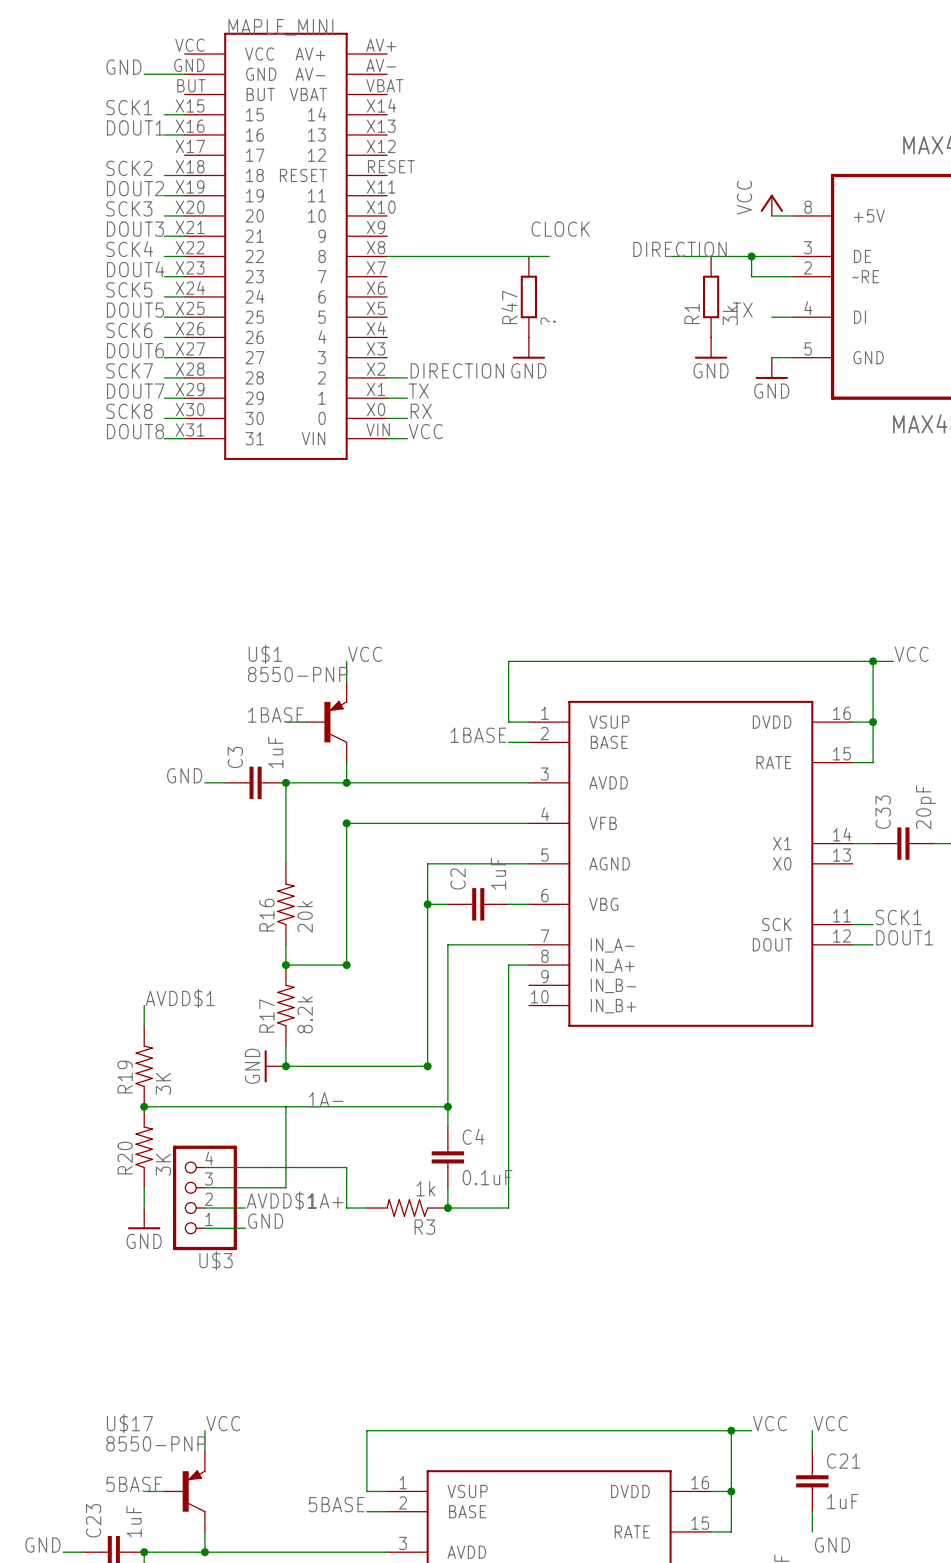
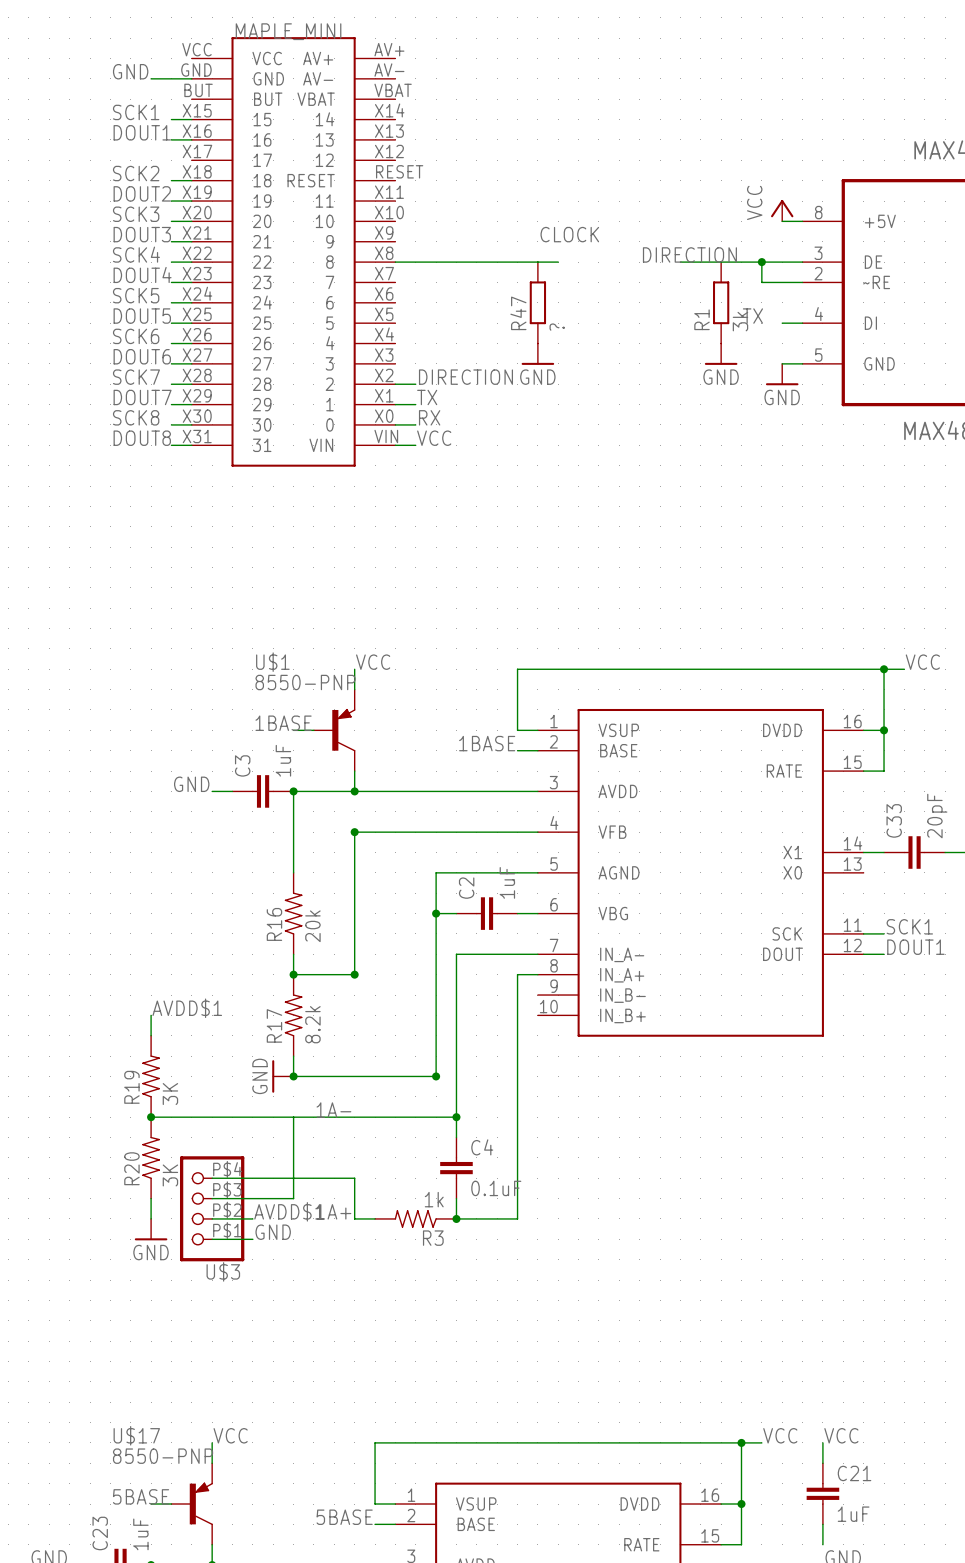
U$3 pin number: 4 (209, 1158) -> P$4 (227, 1169)
U$3 pin number: 3 (208, 1179) -> P$3 (227, 1189)
U$3 pin number: 2 (208, 1199) -> P$2 (227, 1210)
U$3 pin number: 1 (209, 1219) -> P$1 (227, 1230)

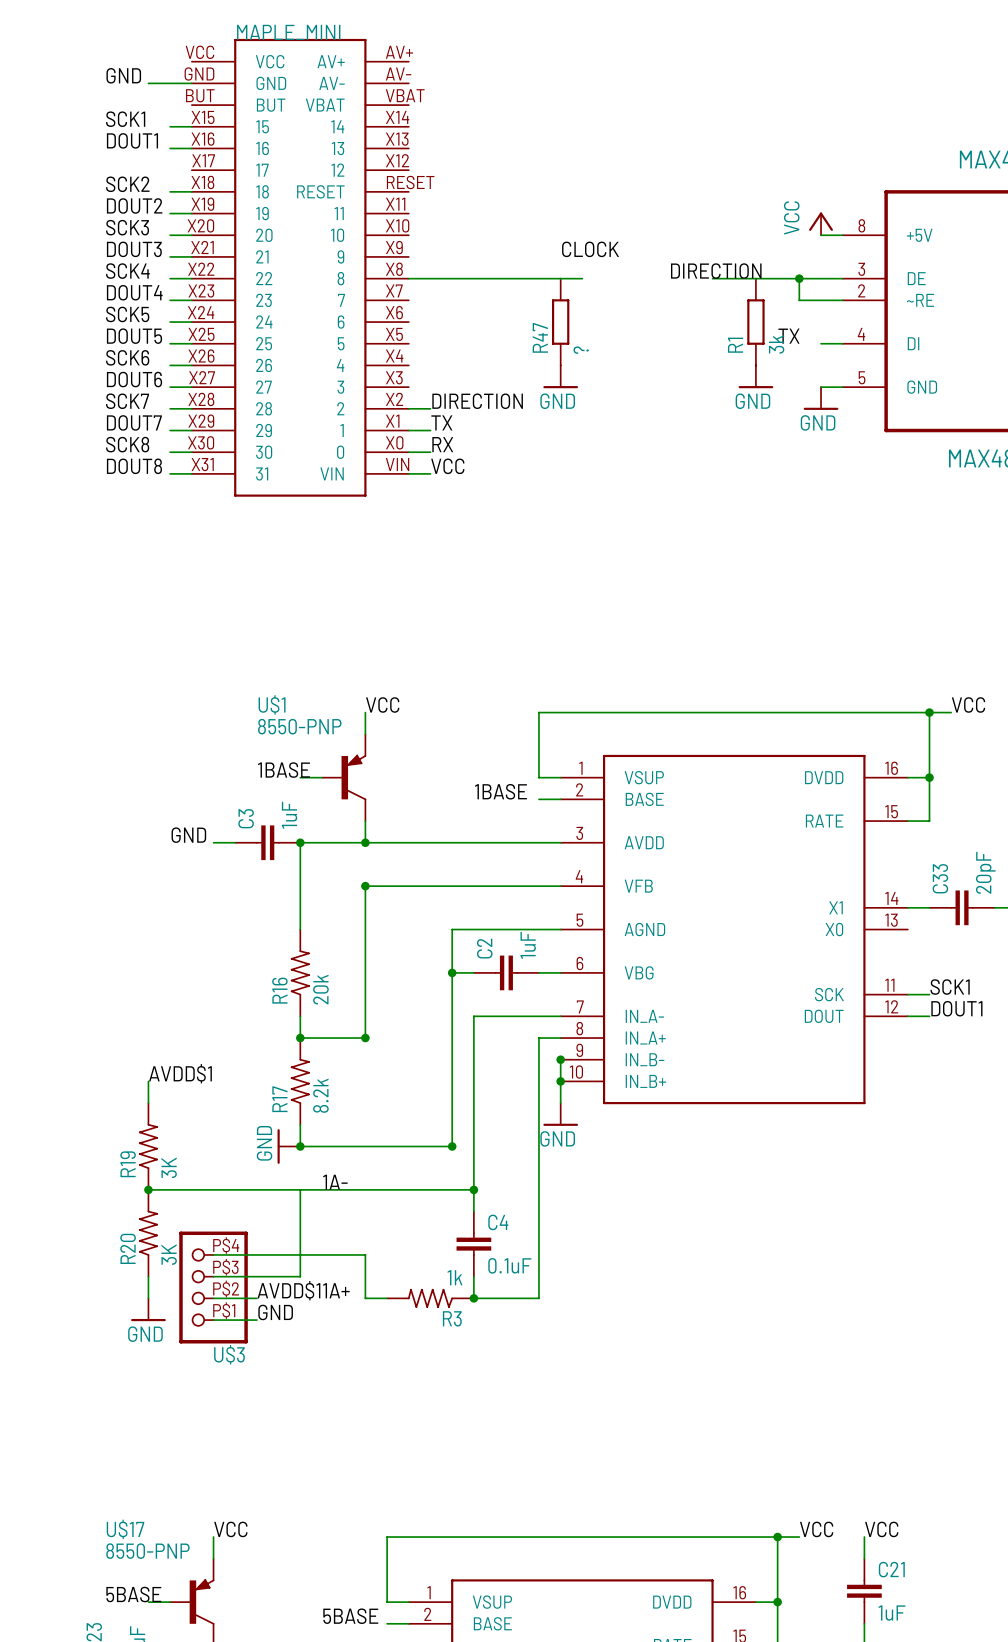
wire: none -> (560, 1059) (560, 1103)
junction: none -> (560, 1059)
junction: none -> (560, 1081)
power symbol: none -> GND (560, 1114)

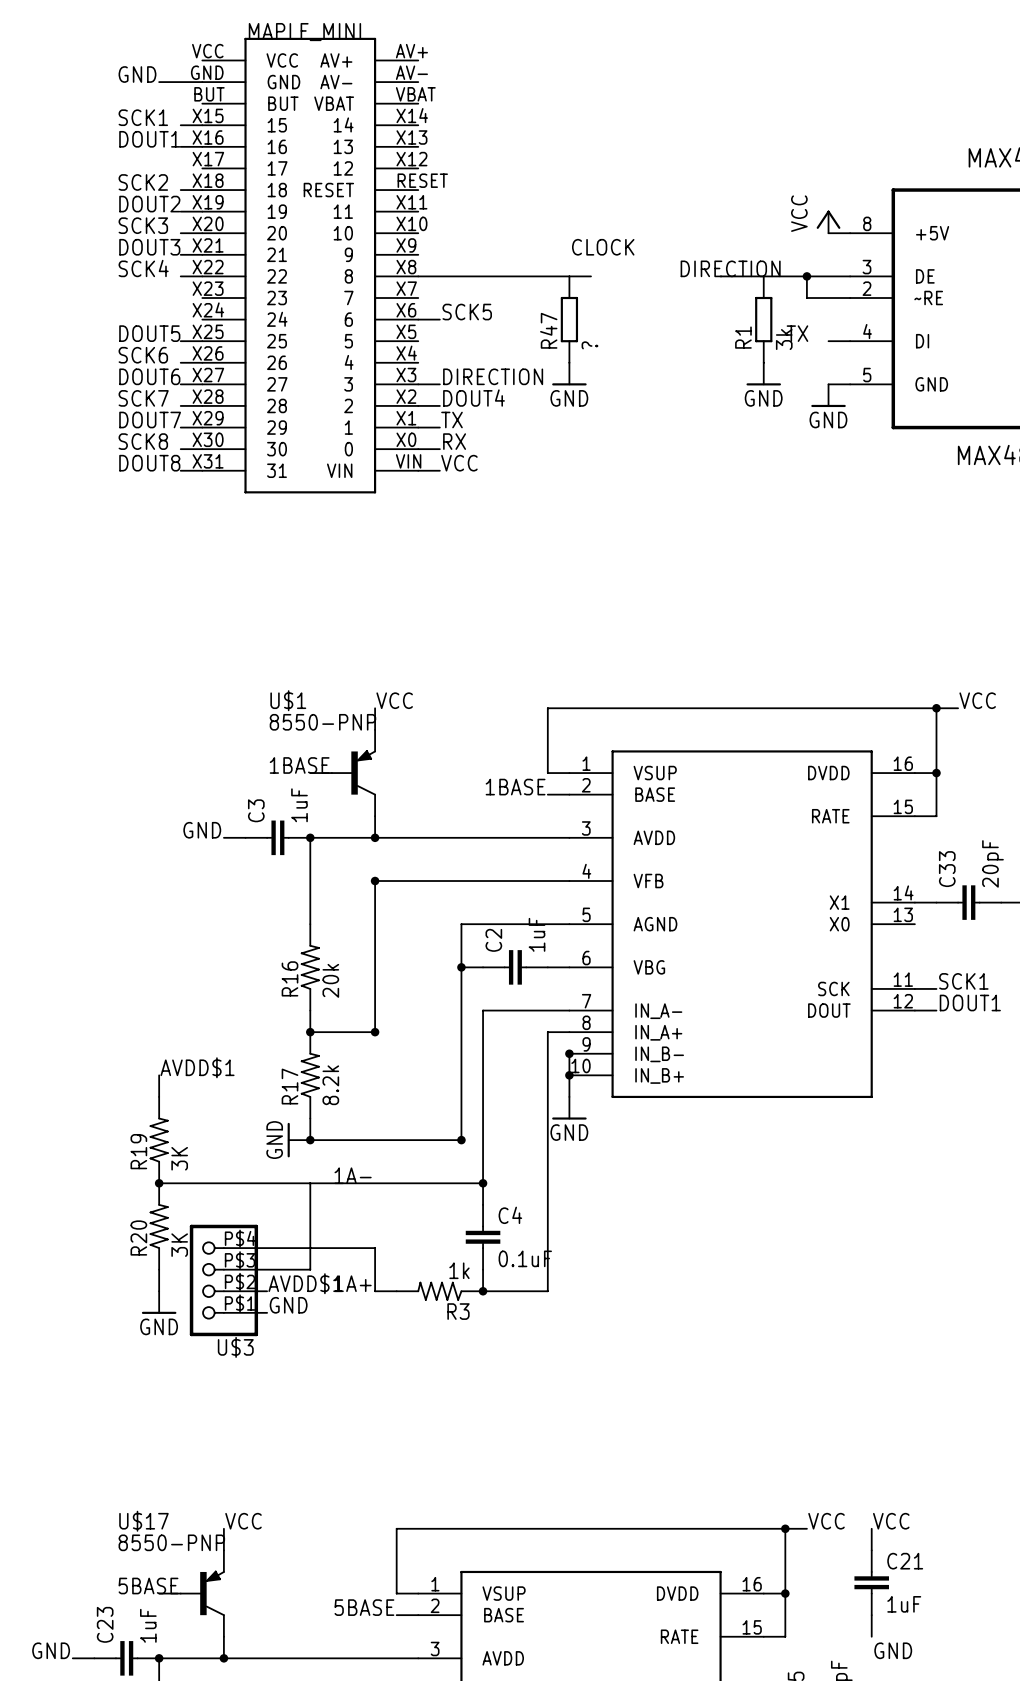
label: DOUT4 (134, 292) -> none
wire: (170, 300) (191, 300) -> none
label: SCK5 (127, 314) -> none
label: none -> SCK5 (467, 312)
wire: (170, 322) (191, 322) -> none
wire: none -> (418, 319) (439, 319)
label: none -> DIRECTION (493, 376)
wire: none -> (418, 384) (439, 384)
label: DIRECTION (477, 401) -> DOUT4 (474, 398)

